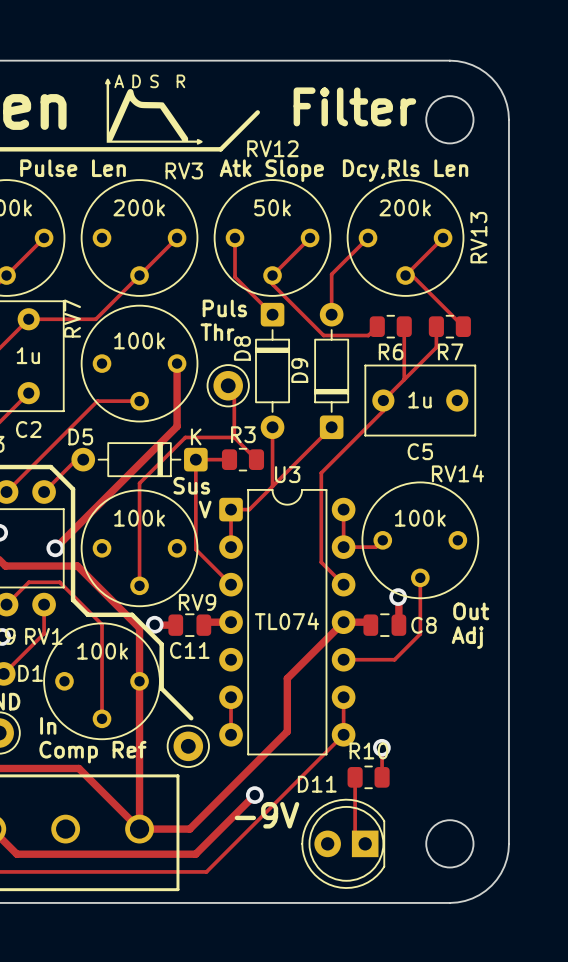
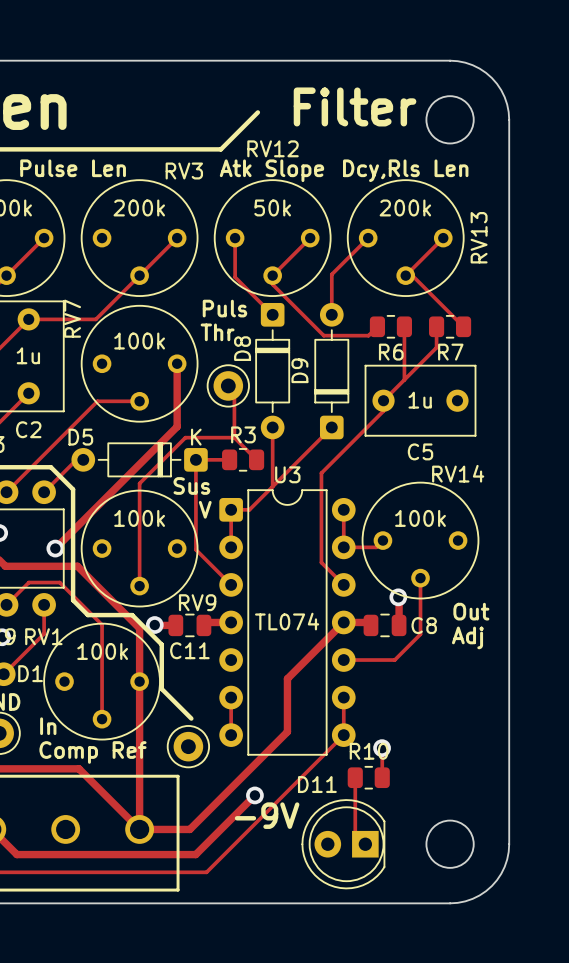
drawing: [105, 78, 203, 145] -> none
text: A (119, 81) -> none
text: D (136, 81) -> none
text: S (154, 81) -> none
text: R (180, 81) -> none

